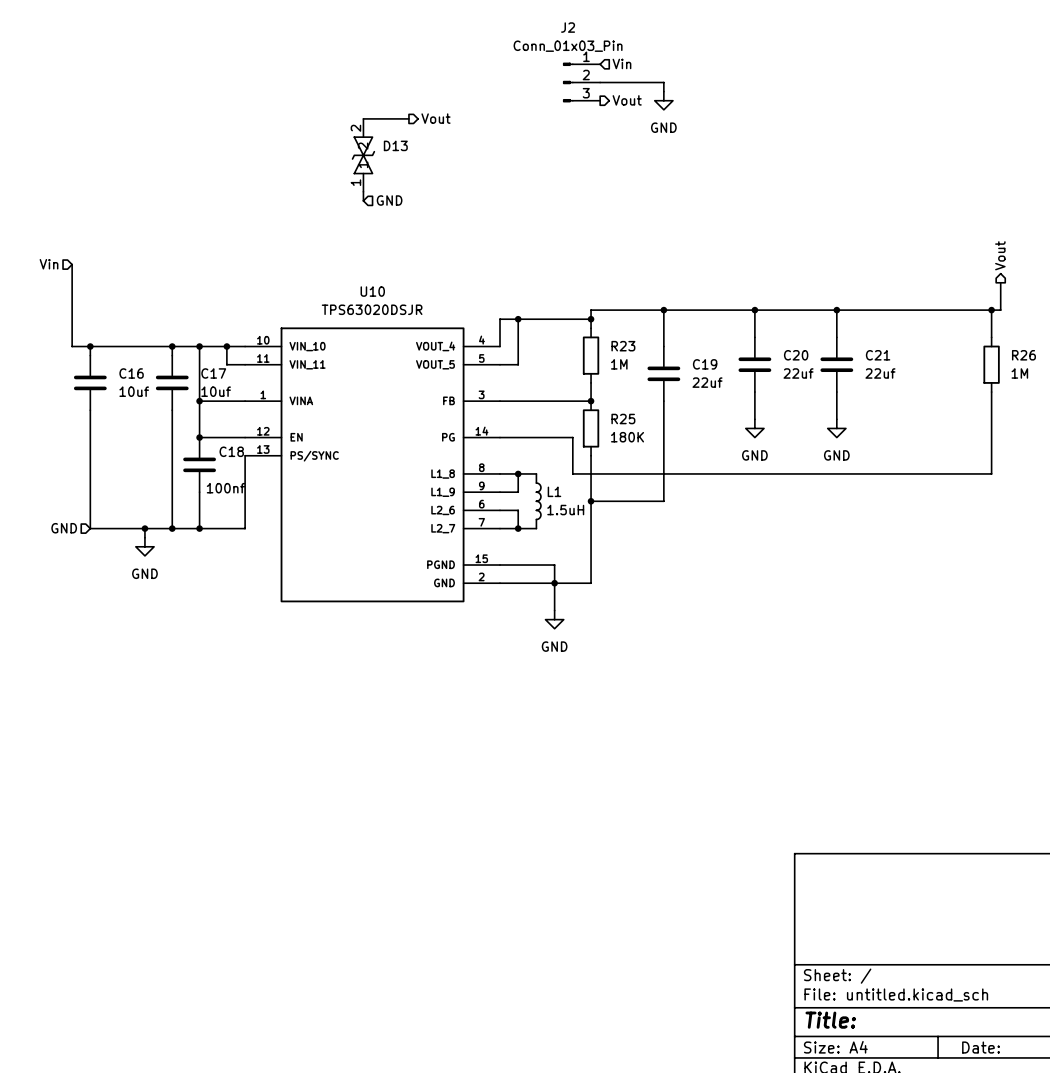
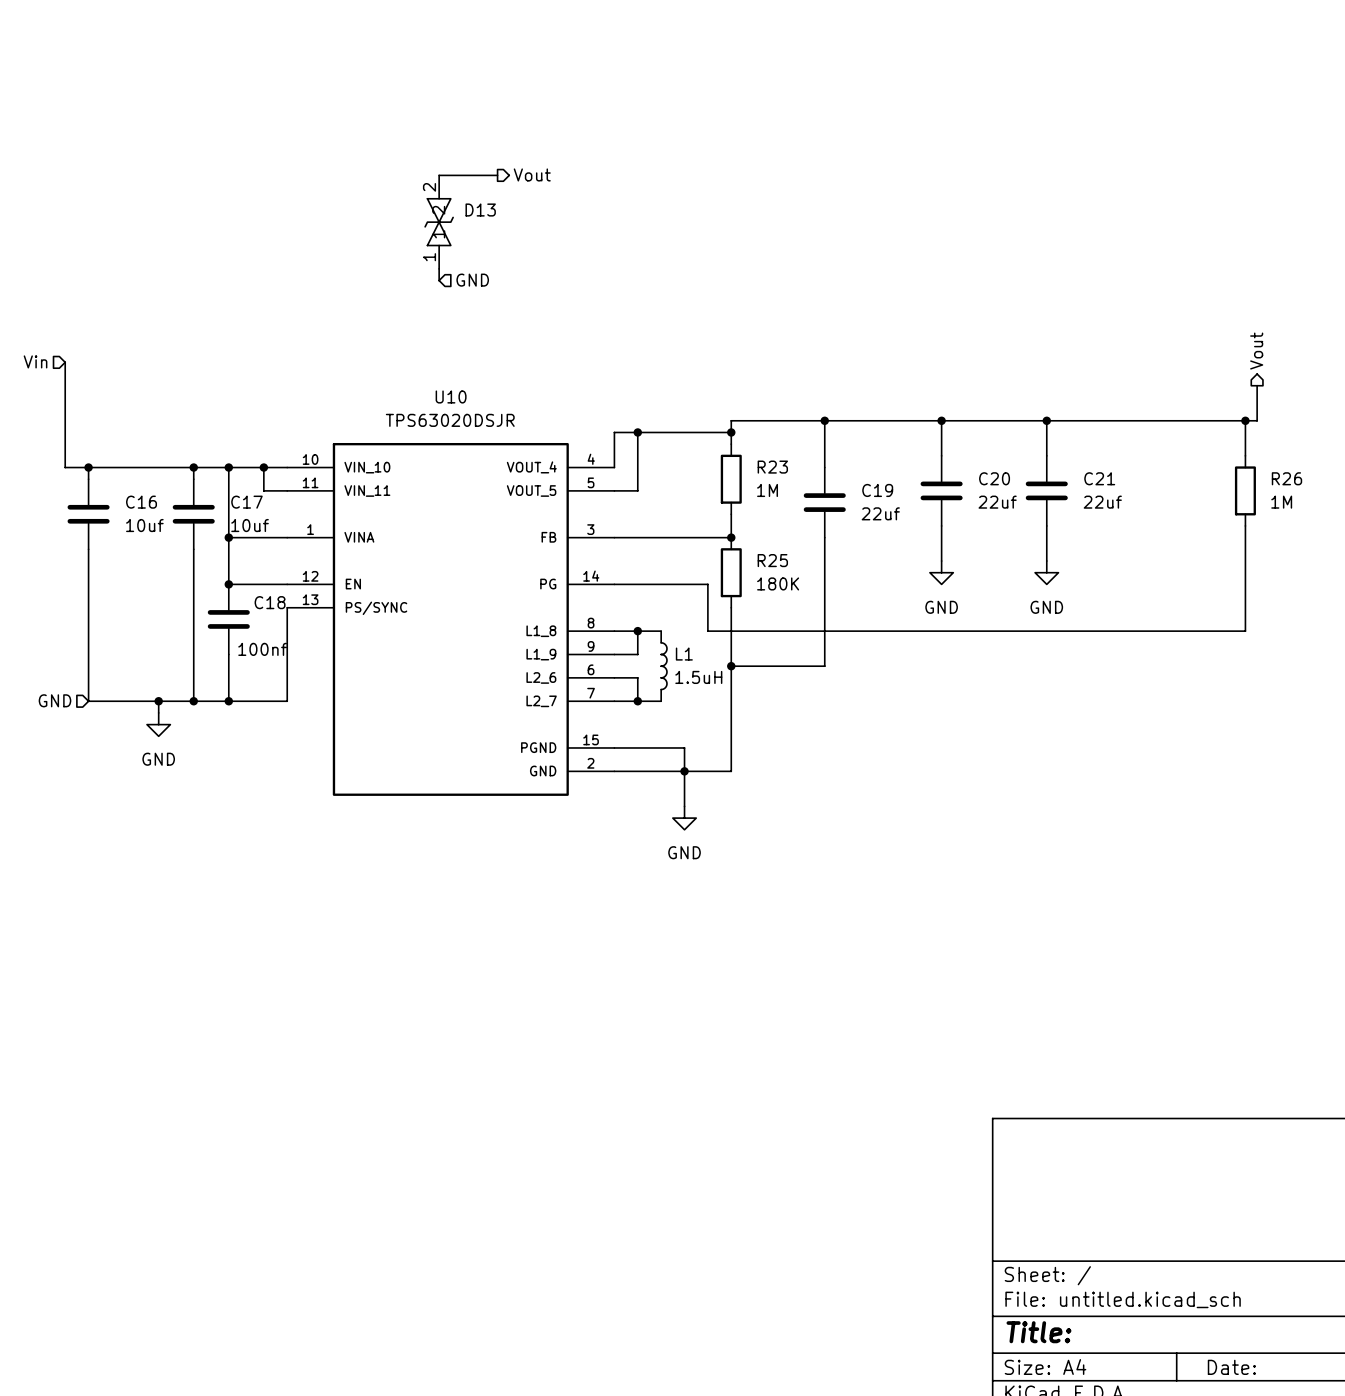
hierarchical label: Vin (621, 63) -> none
J2: Conn_01x03_Pin (581, 82) -> none
wire: (600, 82) (663, 82) (663, 91) -> none
hierarchical label: Vout (627, 100) -> none
power symbol: GND (663, 100) -> none

